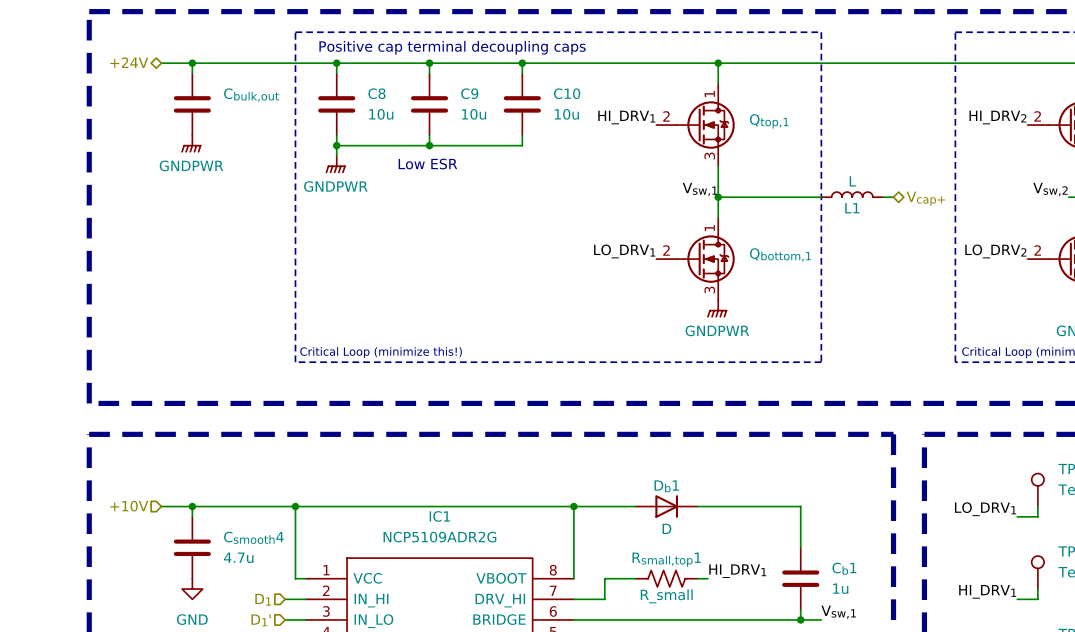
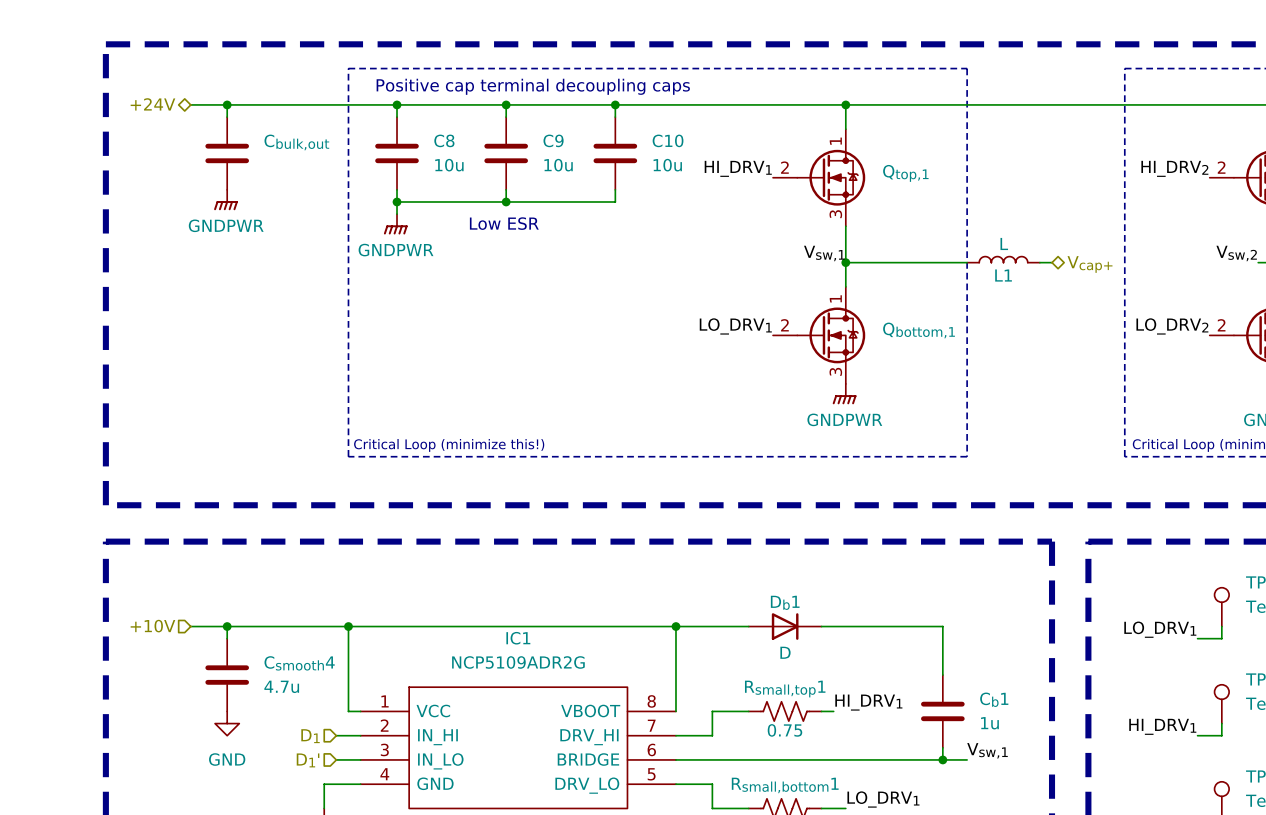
Rsmall,top1 value: R_small (666, 596) -> 0.75 (784, 730)

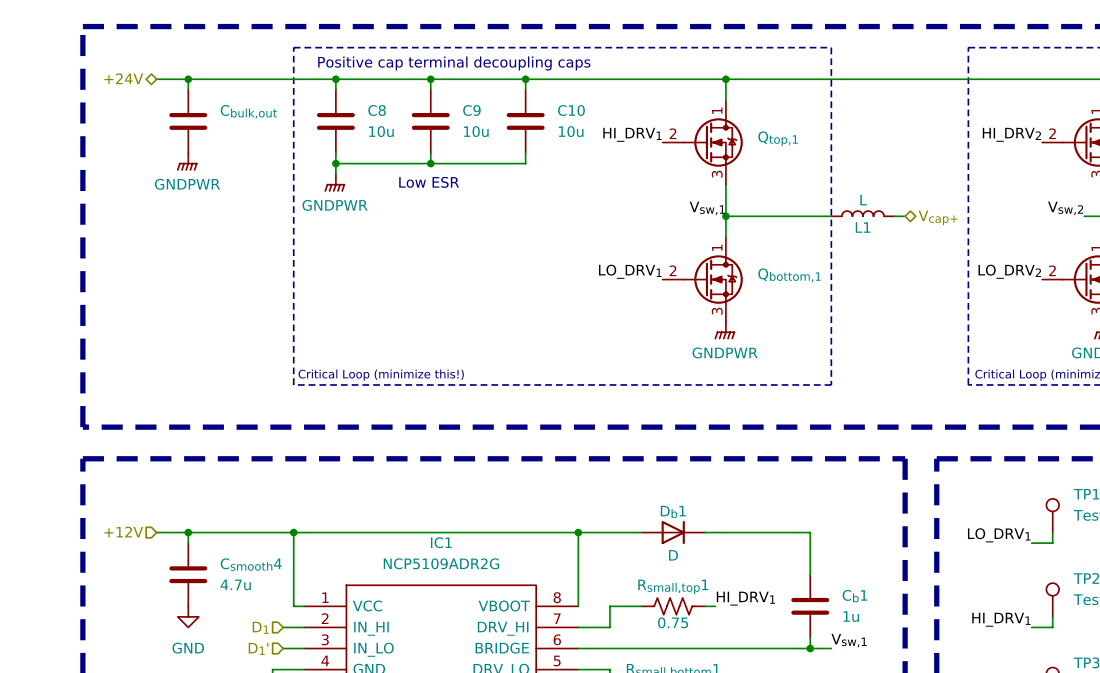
hierarchical label: +10V (152, 626) -> +12V (123, 532)

